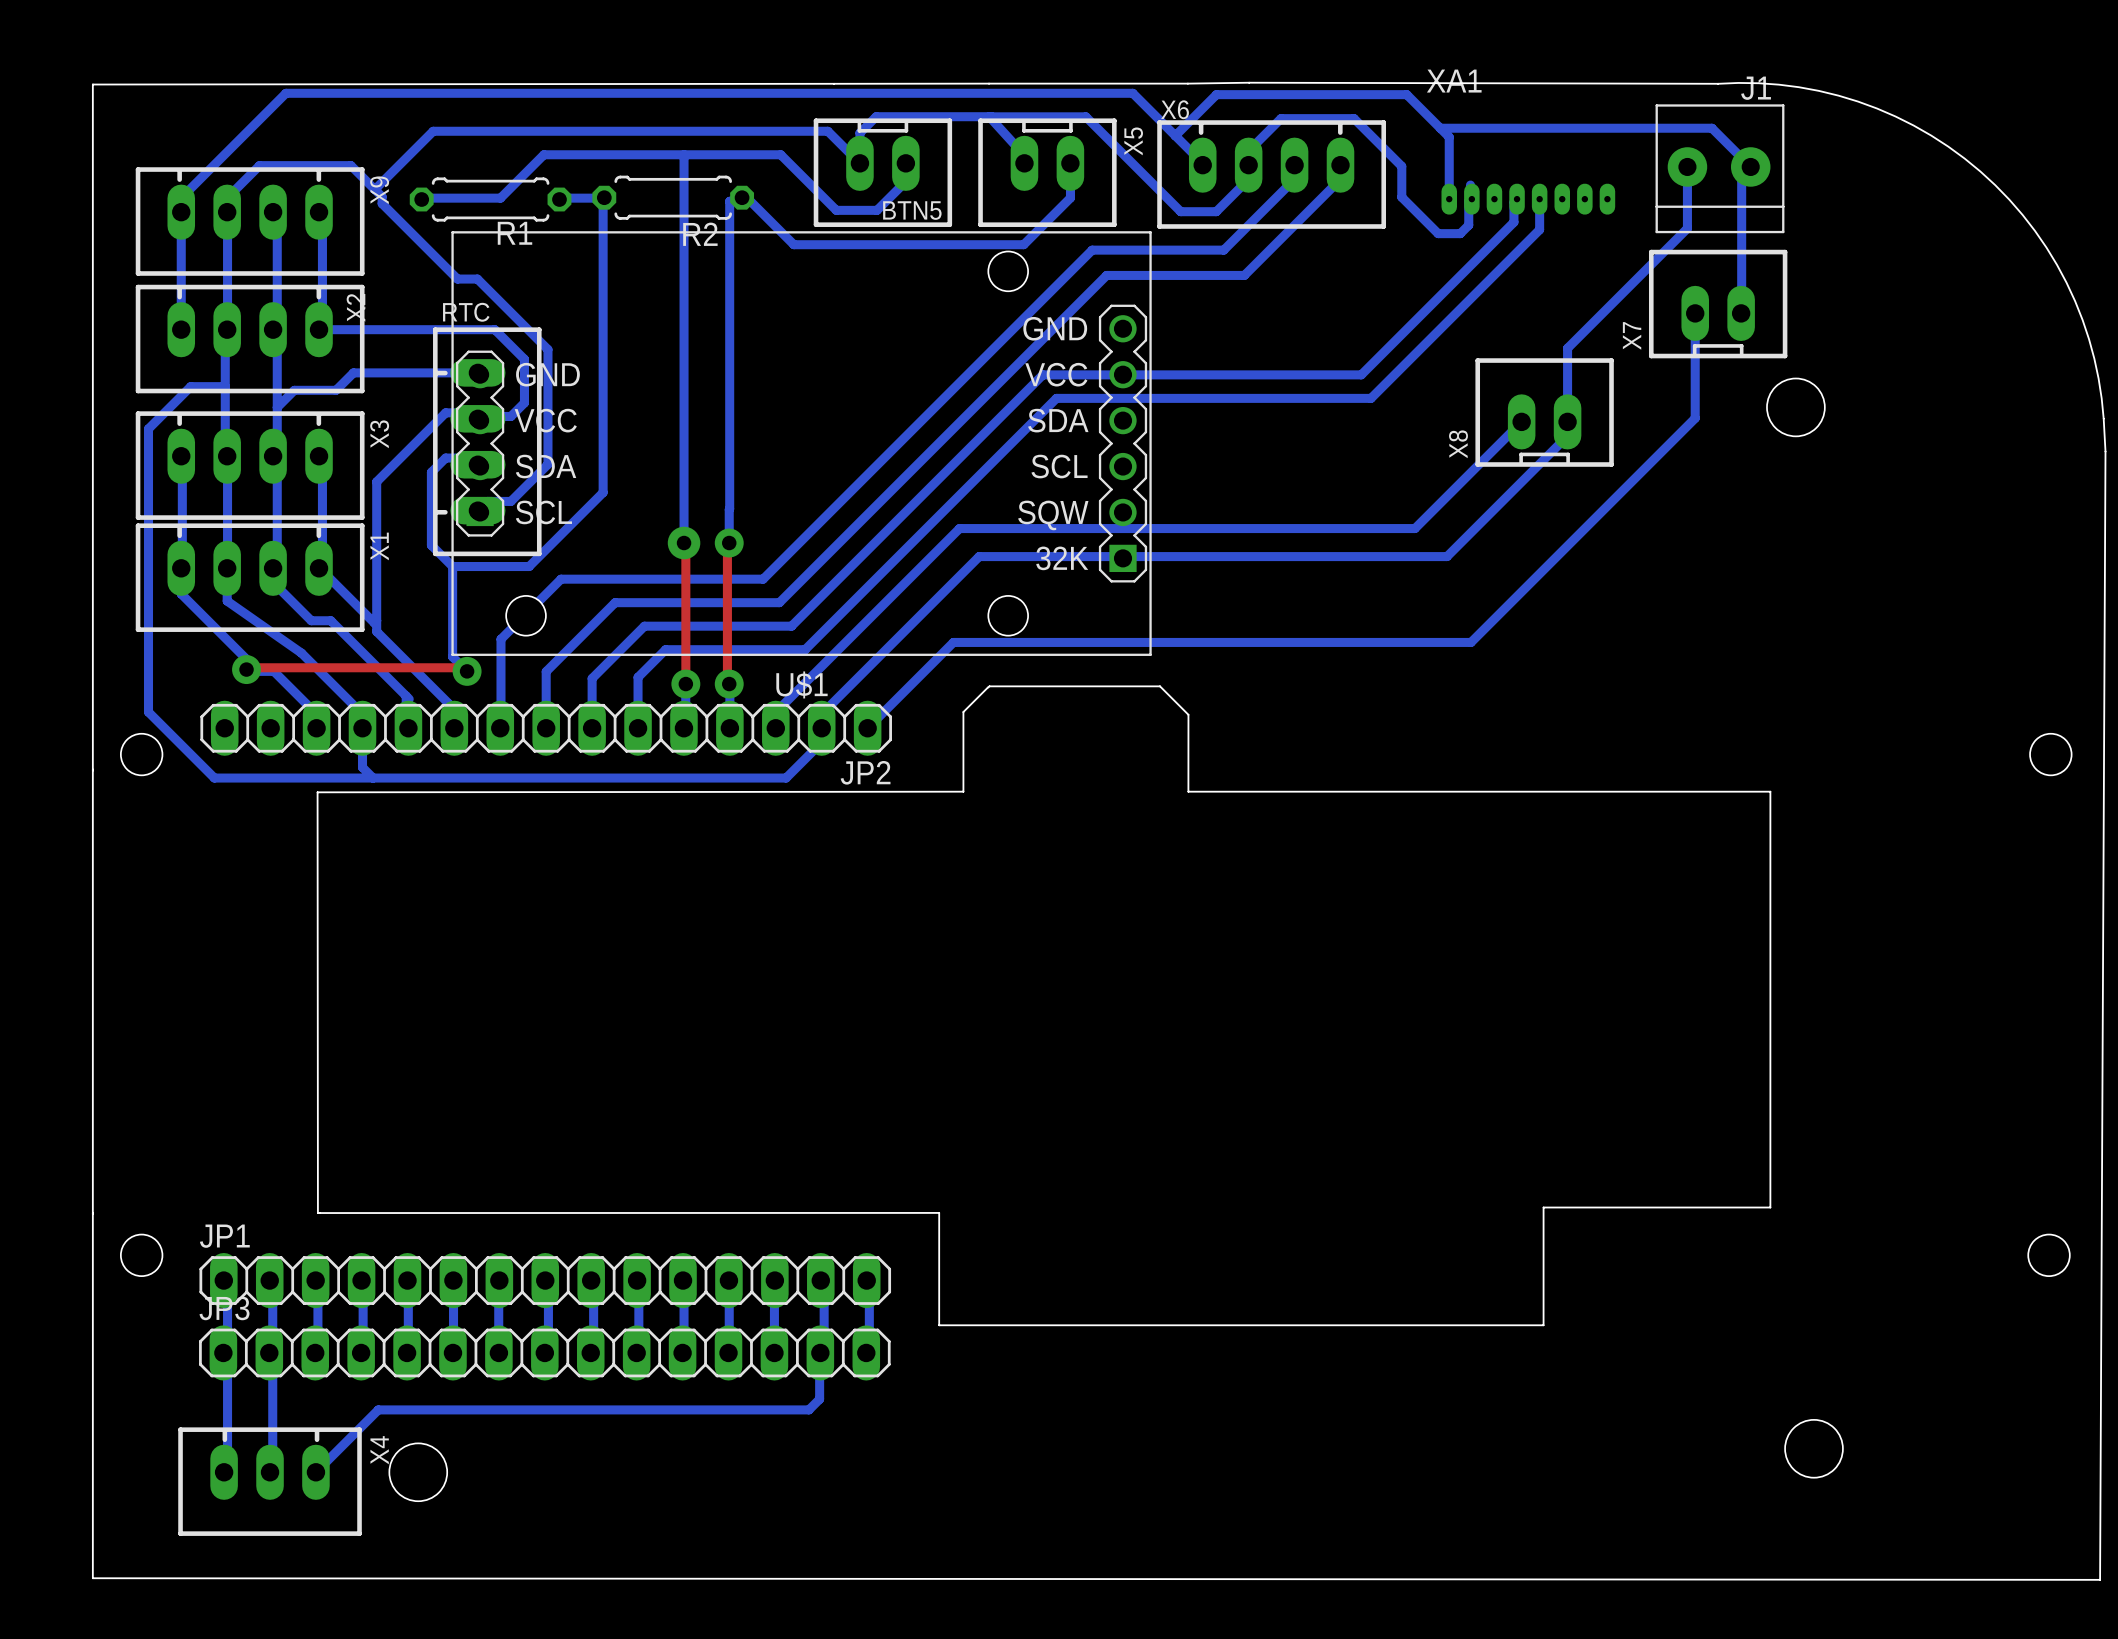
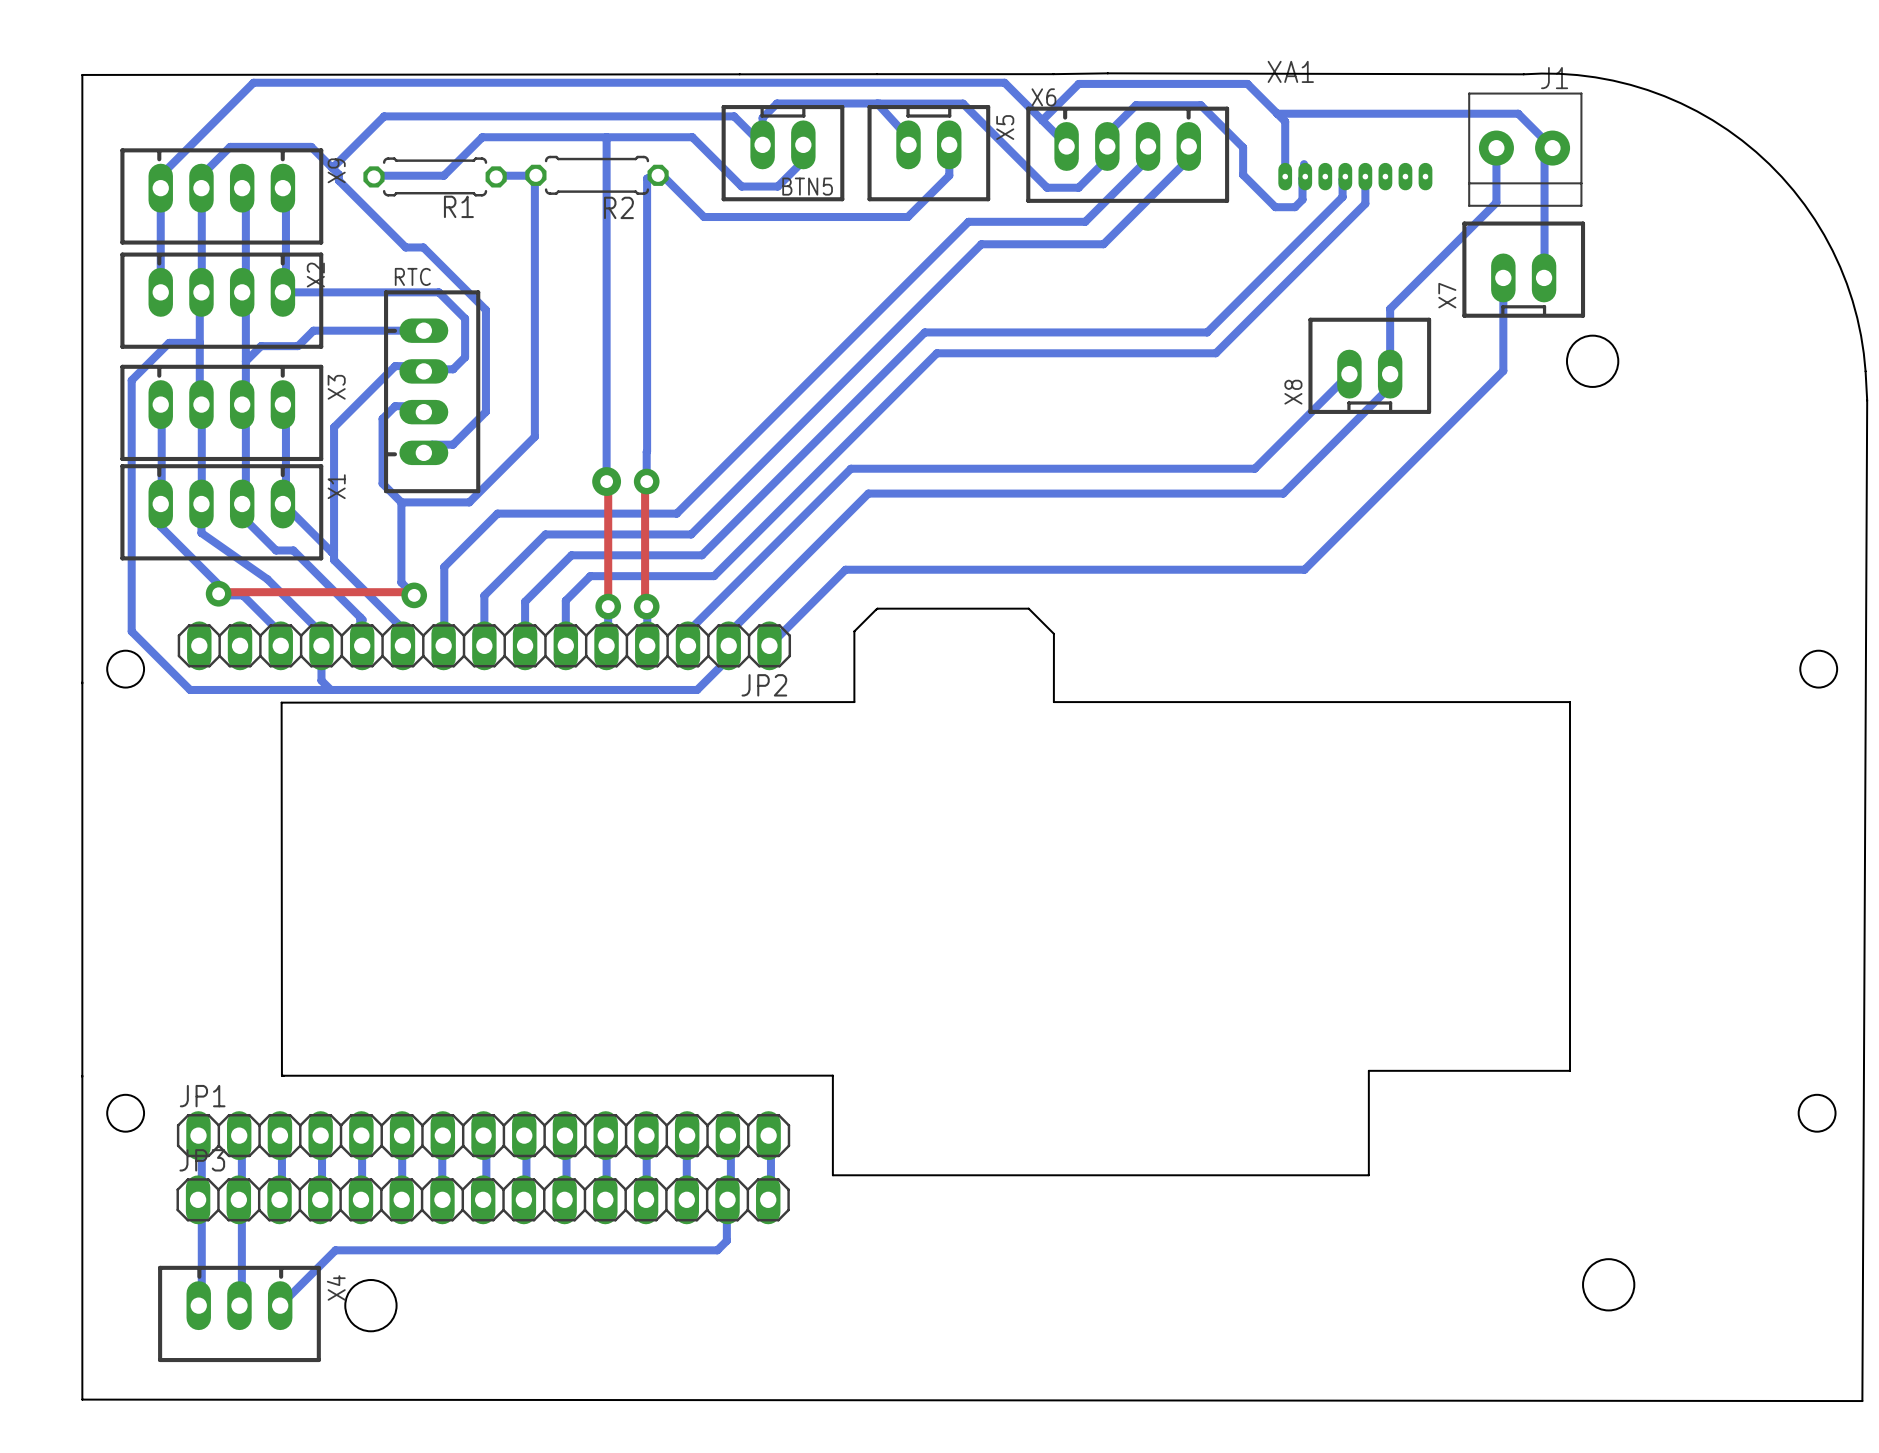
U$1: (801, 443) -> none

